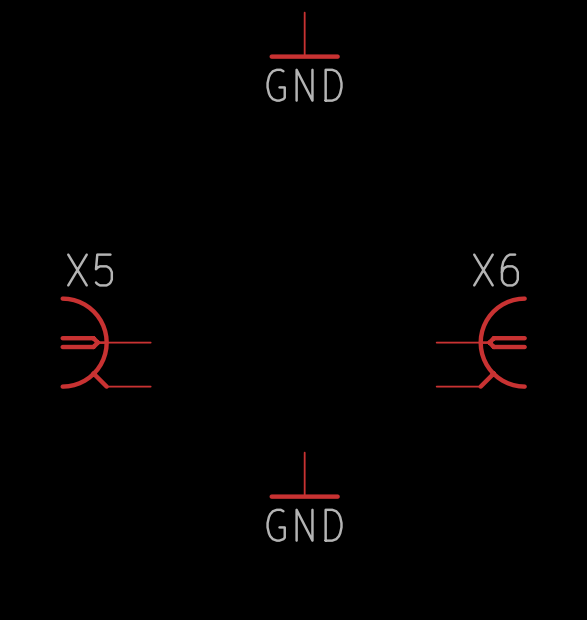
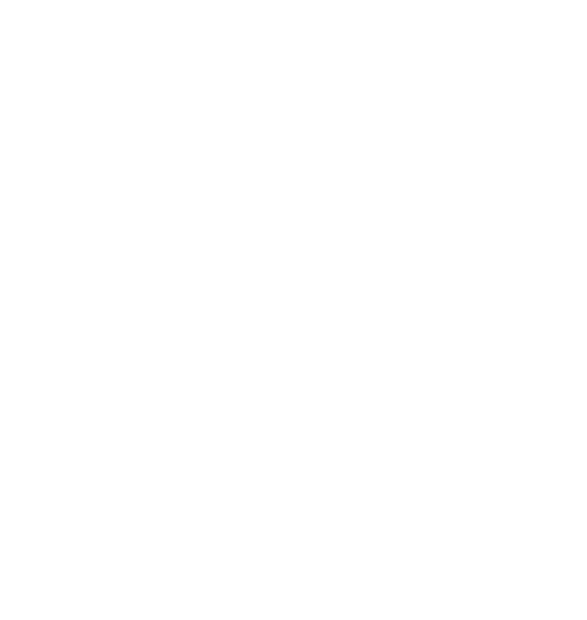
power symbol: GND (304, 35) -> none
X5: (105, 342) -> none
X6: (481, 342) -> none
power symbol: GND (304, 475) -> none

